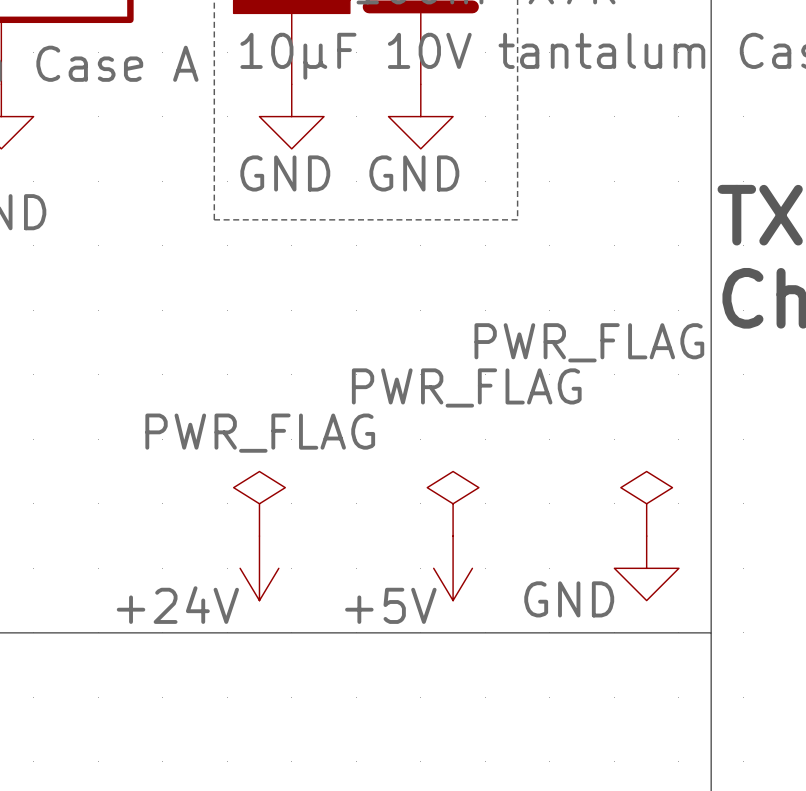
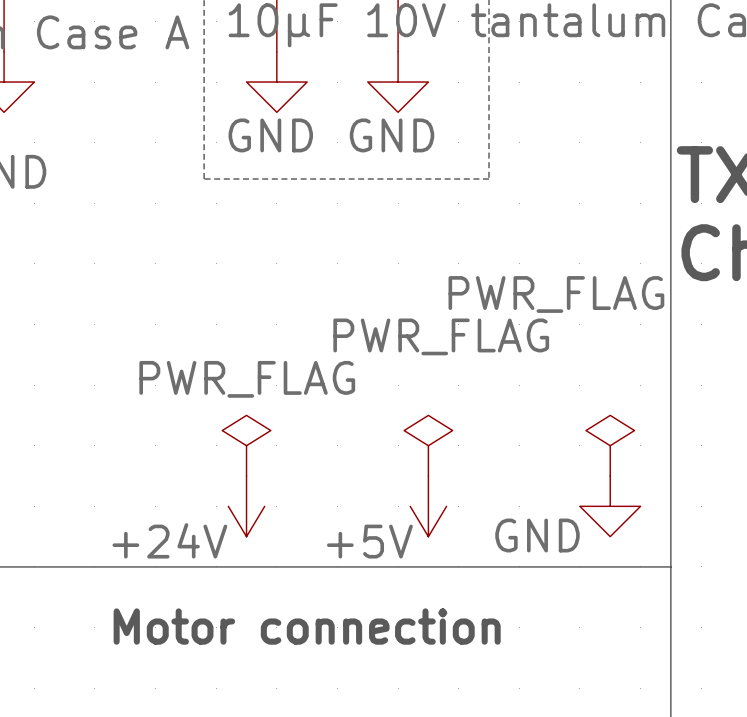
text: none -> Motor connection (307, 626)

